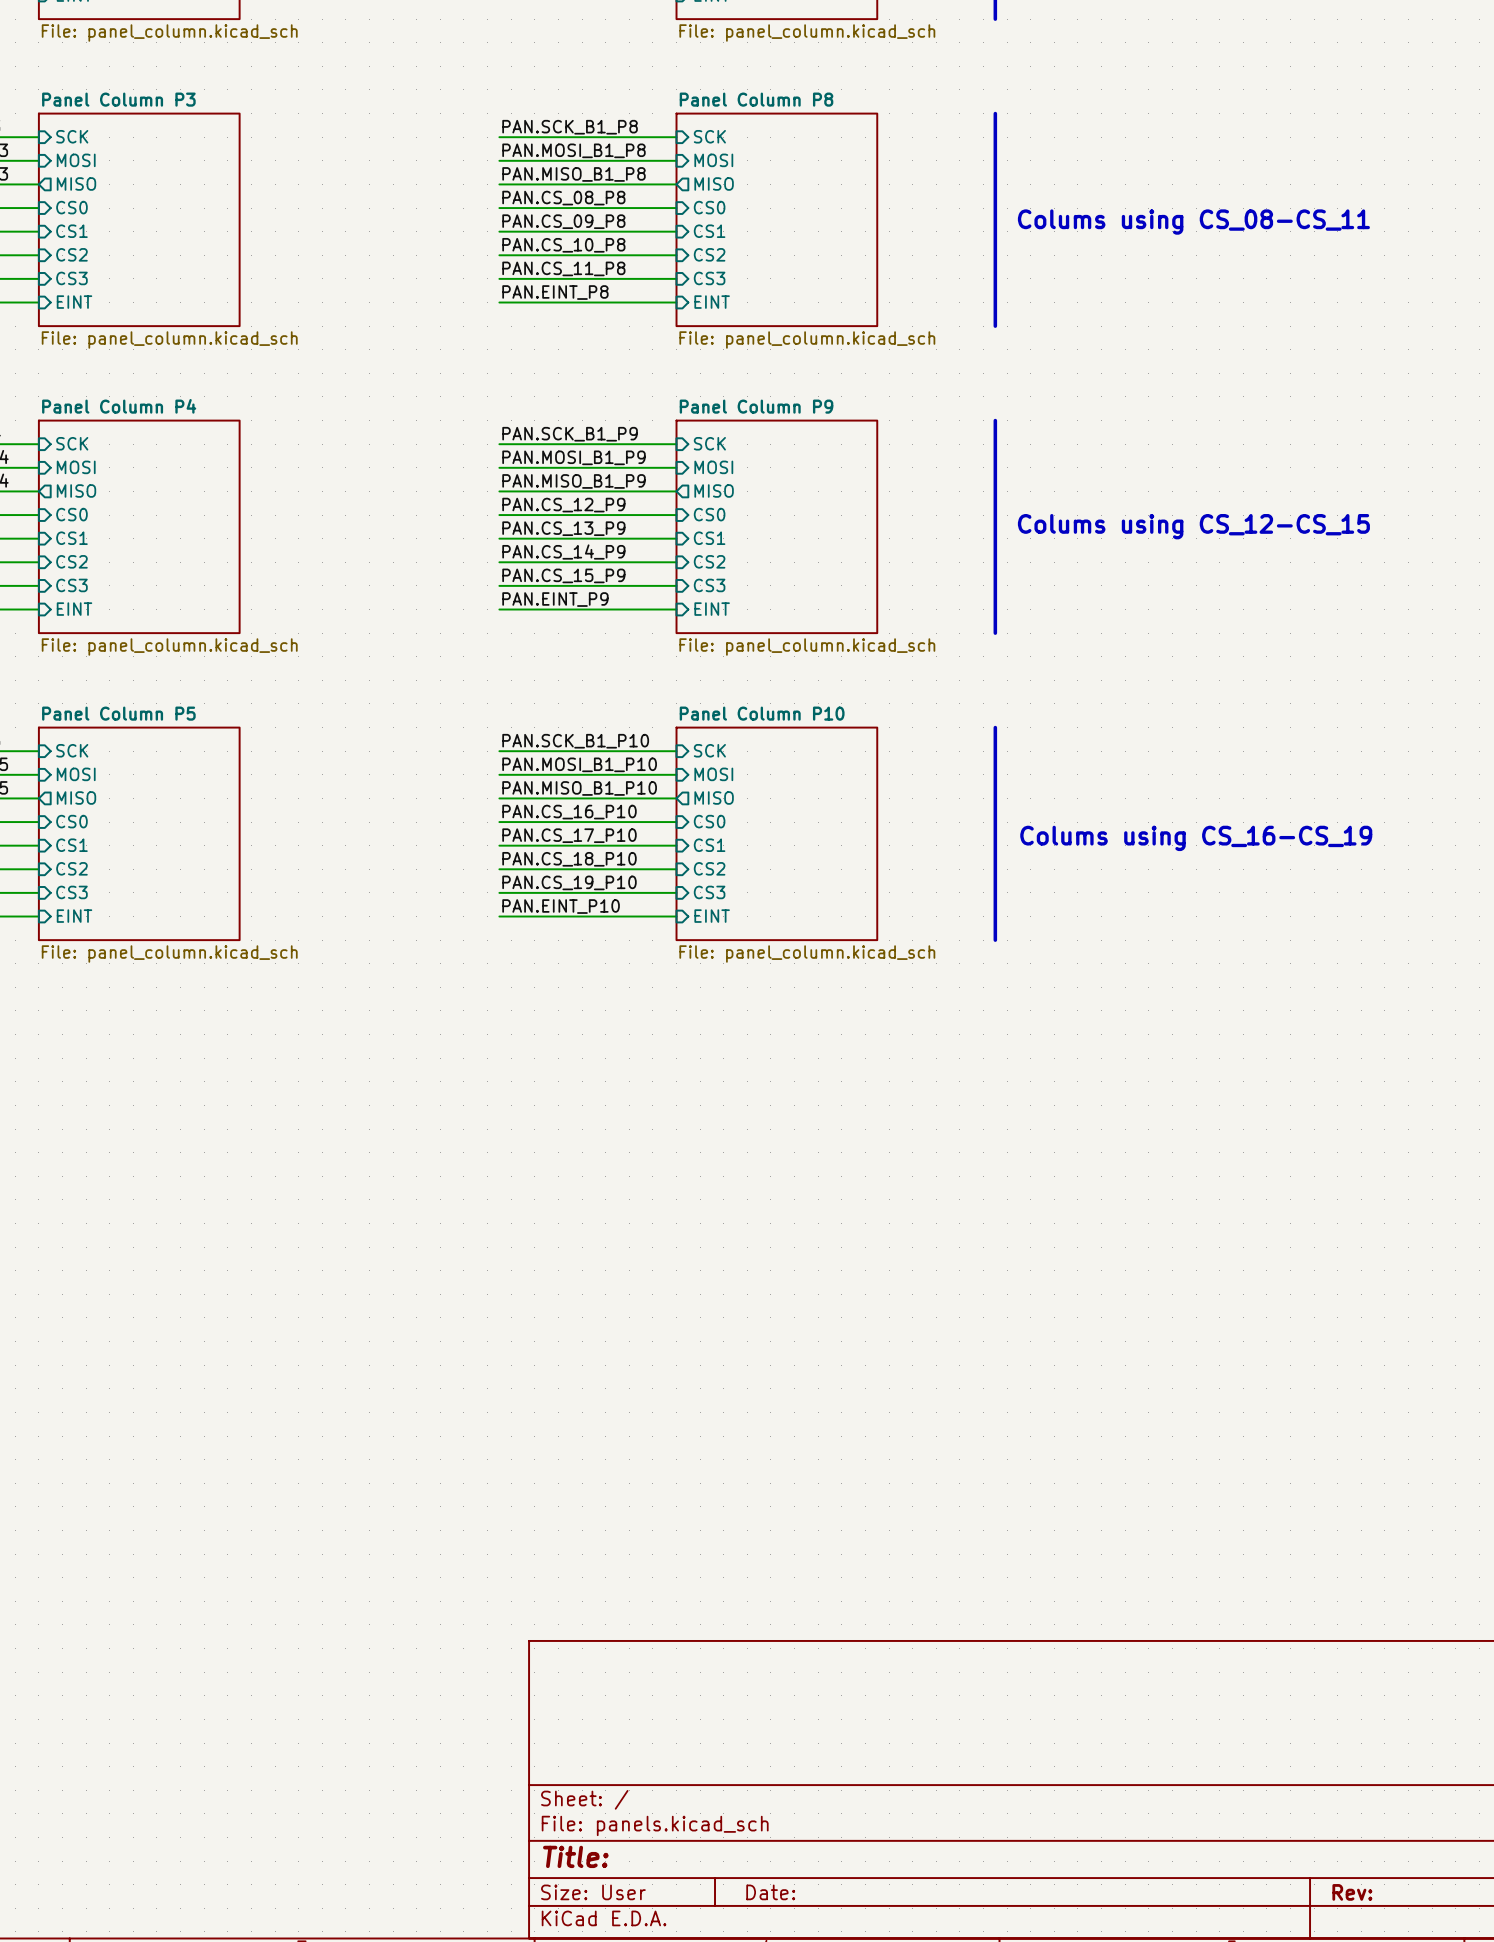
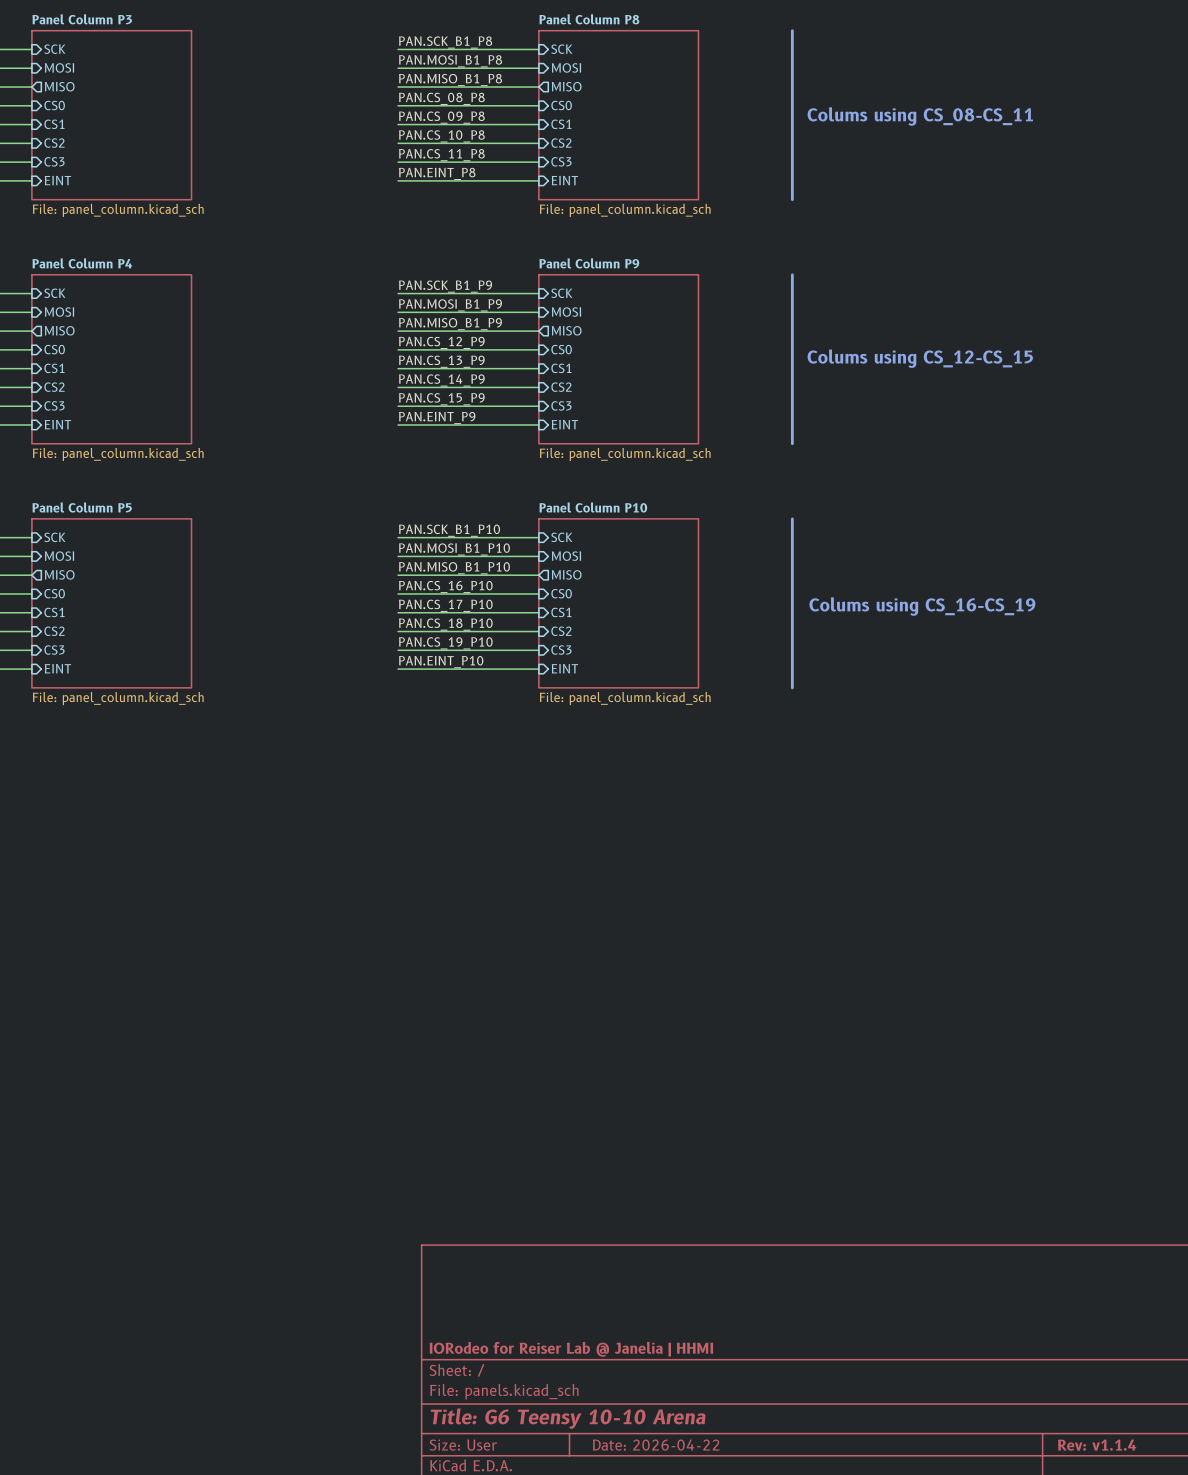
title block: none -> IORodeo for Reiser Lab @ Janelia | HHMI (571, 1349)
title block: Title: (575, 1856) -> Title: G6 Teensy 10-10 Arena (568, 1418)
title block: Date: (770, 1892) -> Date: 2026-04-22 (656, 1445)
title block: Rev: (1352, 1892) -> Rev: v1.1.4 (1097, 1445)

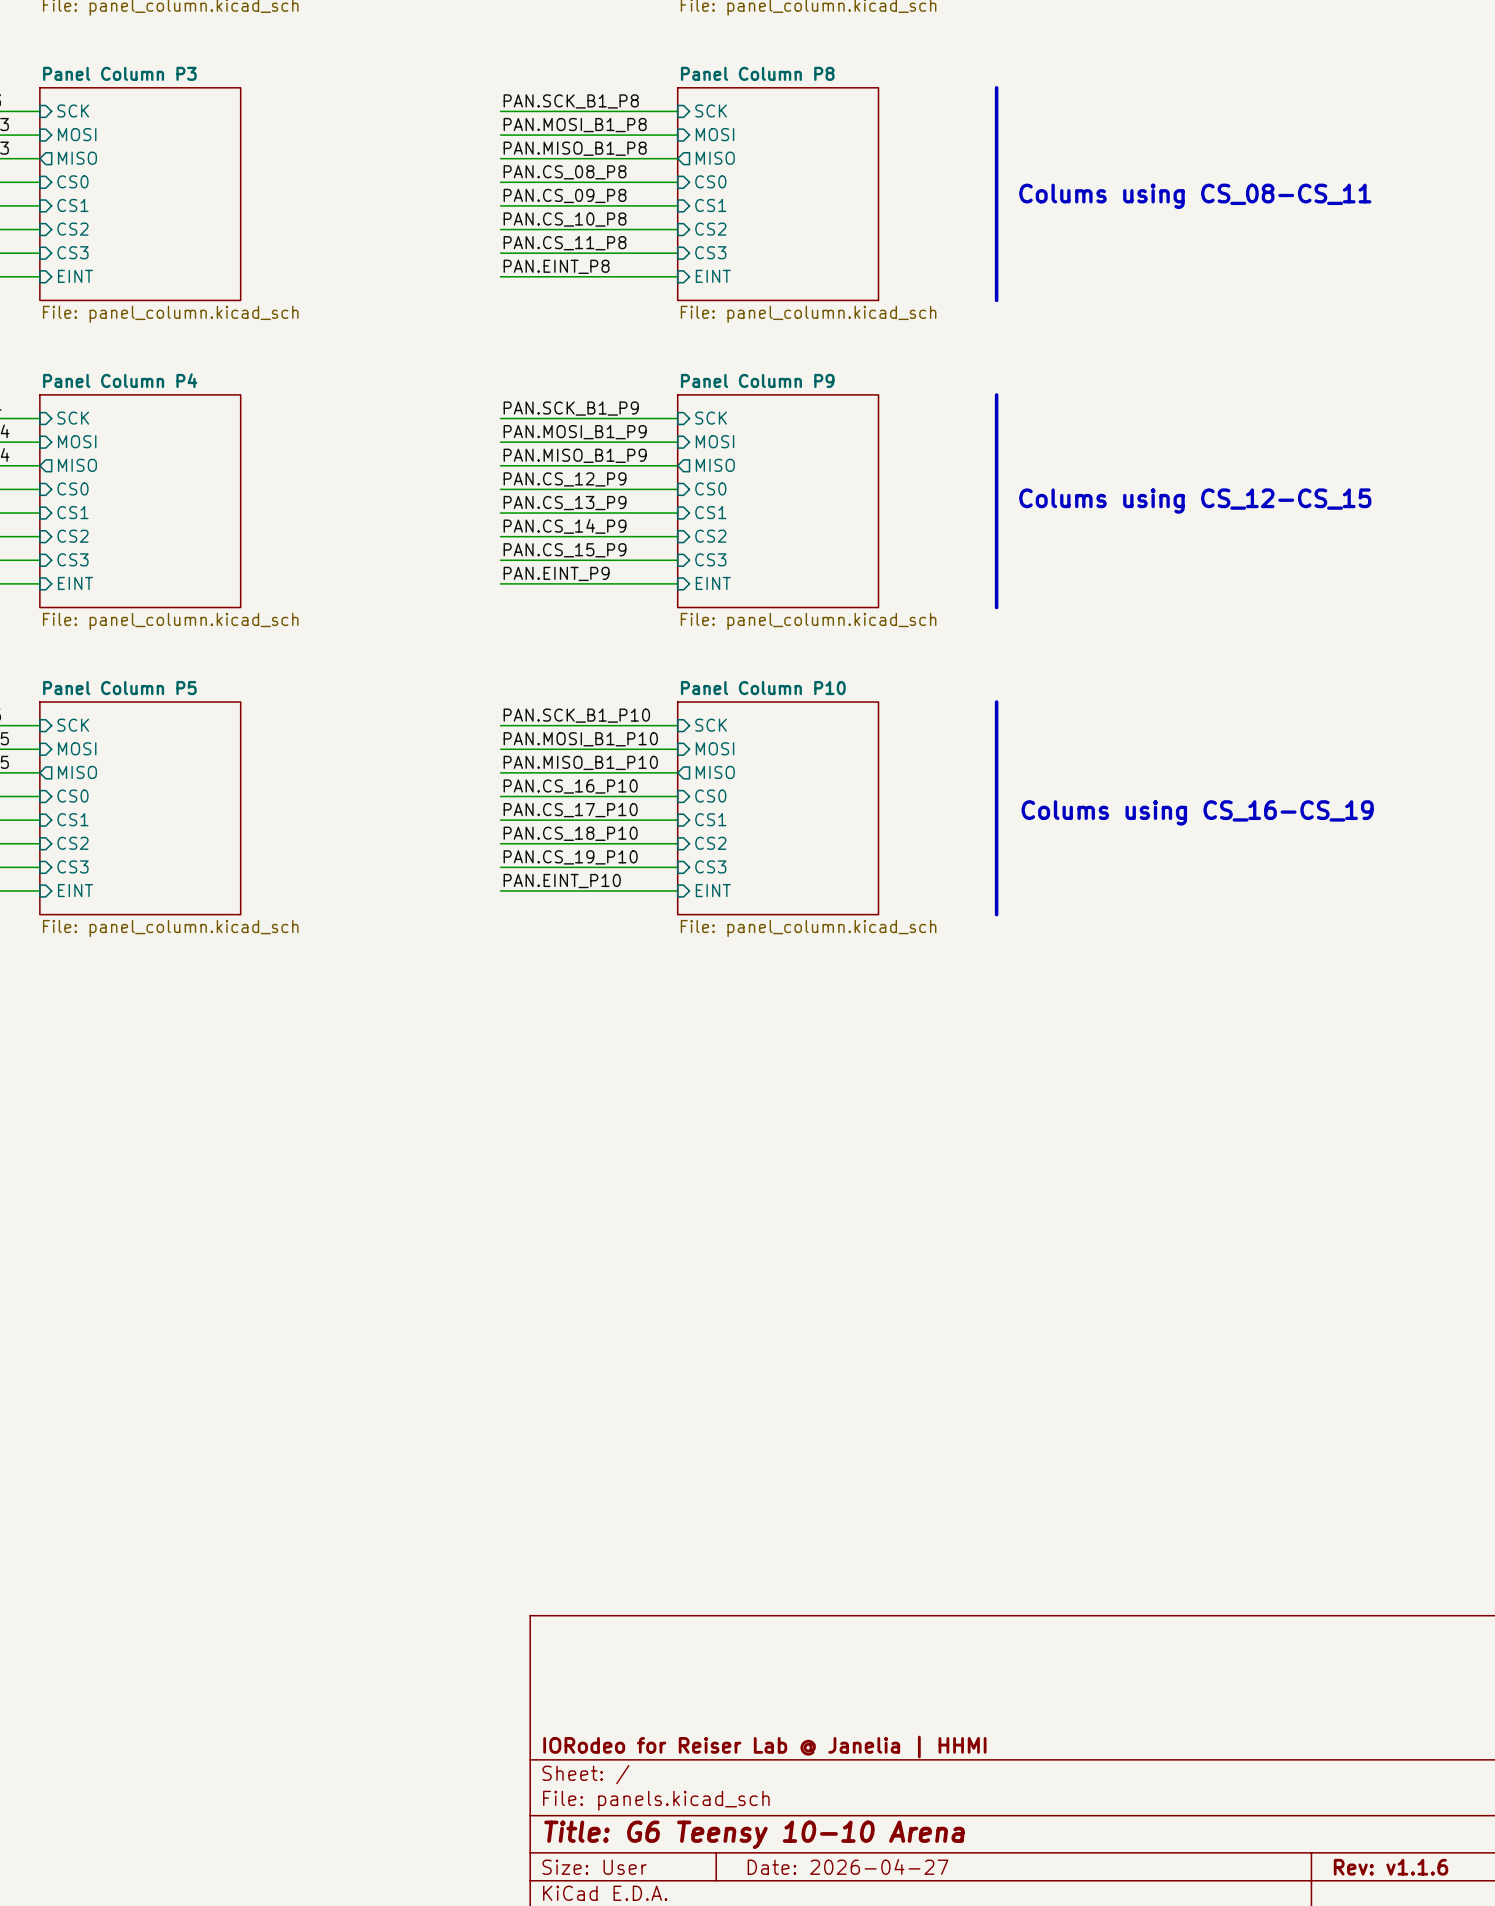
title block: Date: 2026-04-22 (656, 1445) -> Date: 2026-04-27 (848, 1866)
title block: Rev: v1.1.4 (1097, 1445) -> Rev: v1.1.6 (1391, 1867)

